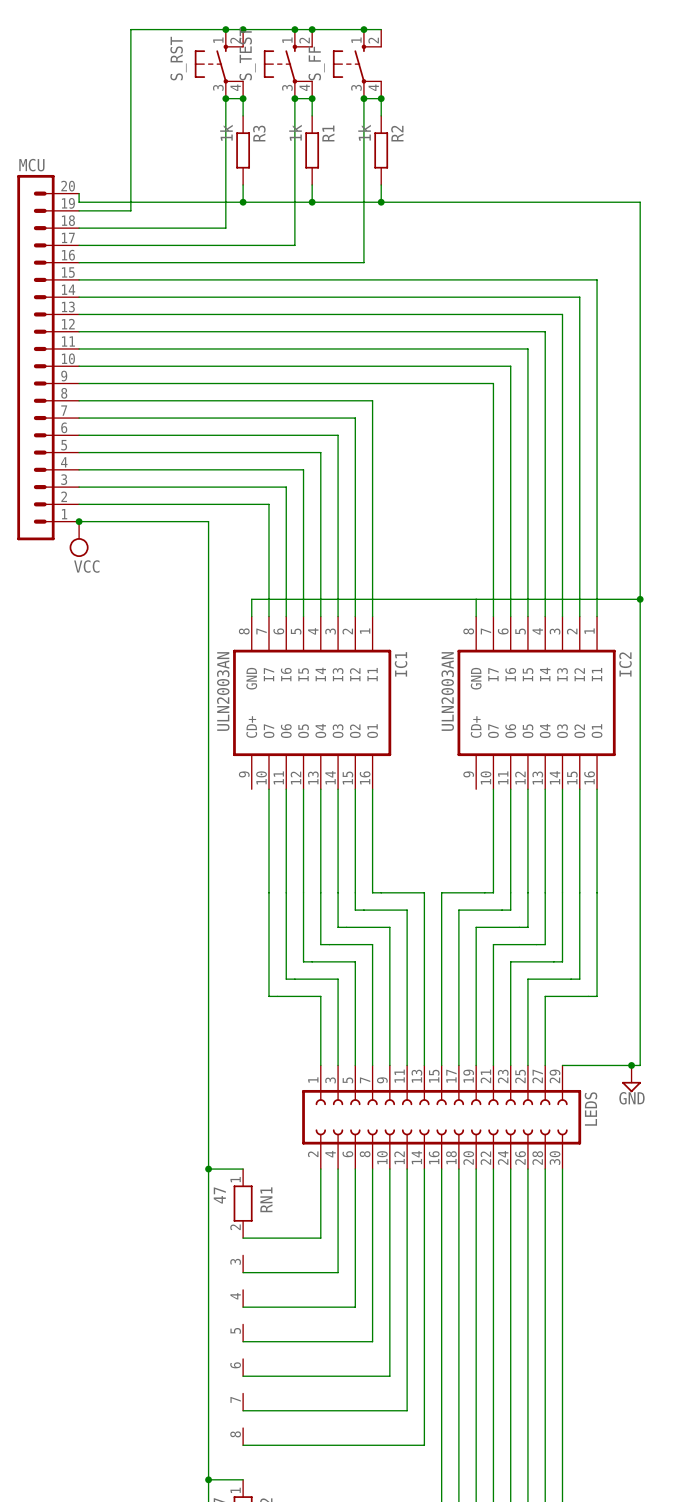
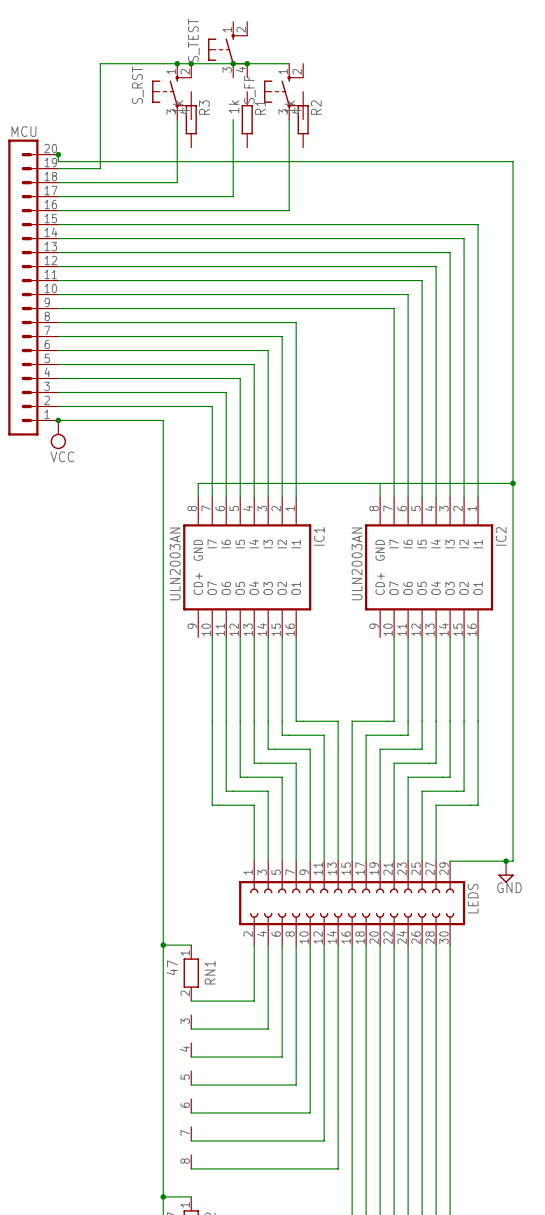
junction: (225, 29) -> none
junction: (243, 29) -> none
junction: (294, 29) -> none
junction: (312, 29) -> none
junction: (363, 29) -> none
wire: (381, 29) (130, 29) (130, 81) -> (289, 63) (100, 63)
S_RST position: (219, 64) -> (171, 91)
S_FF position: (357, 64) -> (283, 91)
junction: none -> (177, 63)
junction: none -> (191, 63)
junction: none -> (233, 63)
junction: none -> (247, 63)
junction: (225, 98) -> none
junction: (243, 98) -> none
junction: (294, 98) -> none
junction: (312, 98) -> none
junction: (363, 98) -> none
junction: (381, 98) -> none
wire: (243, 115) (243, 98) (225, 98) (225, 150) -> none
wire: (312, 115) (312, 98) (294, 98) (294, 150) -> none
wire: (381, 115) (381, 98) (363, 98) (363, 150) -> none
wire: (243, 184) (243, 202) -> none
wire: (312, 184) (312, 202) -> none
wire: (381, 184) (381, 202) -> none
junction: none -> (58, 154)
junction: (243, 202) -> none
junction: (312, 202) -> none
junction: (381, 202) -> none

